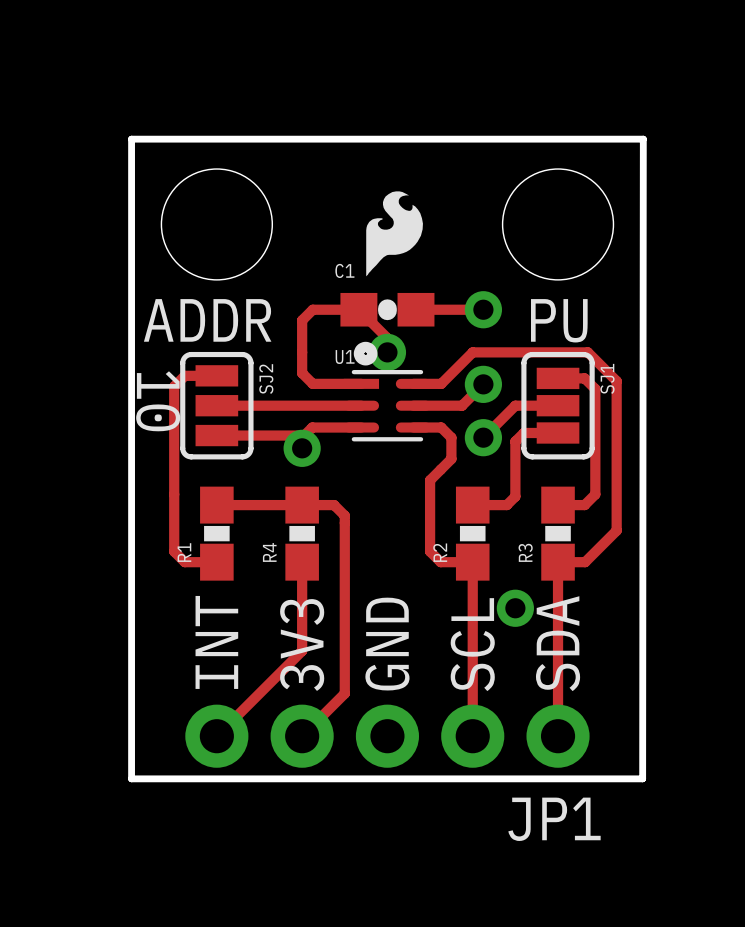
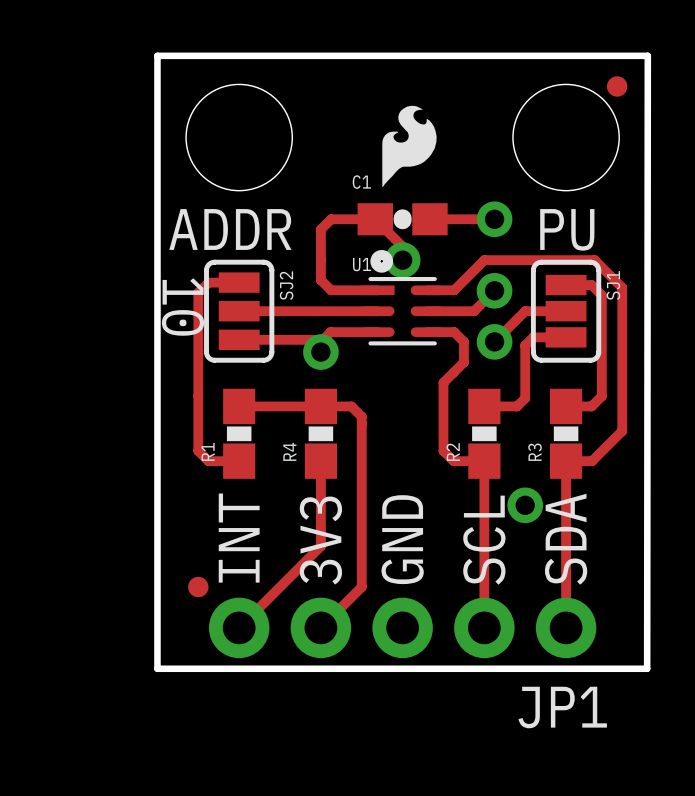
part: none -> (617, 86)
part: none -> (198, 587)

